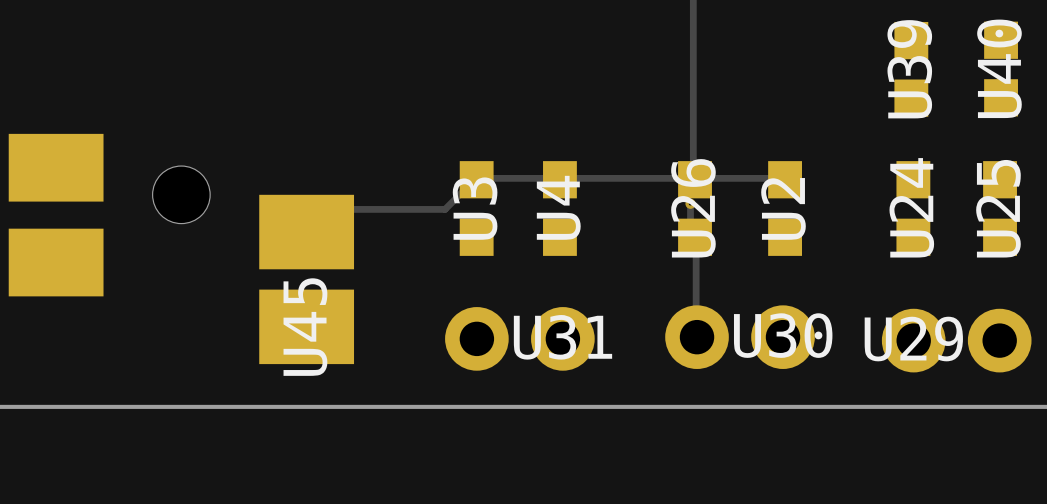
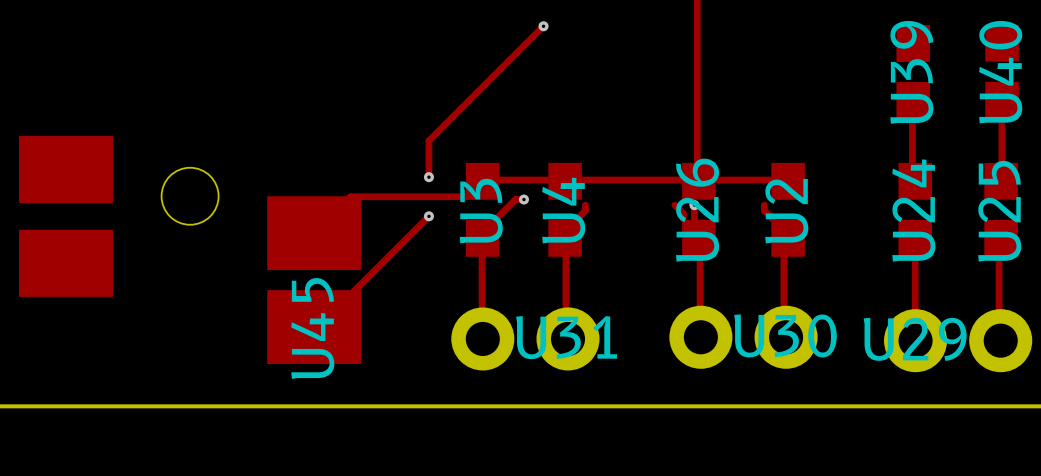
track: none -> (543, 26) (428, 140) (428, 177)
via: none -> (543, 26)
track: none -> (912, 115) (912, 163)
track: none -> (1001, 115) (1001, 163)
via: none -> (428, 177)
track: (464, 189) (445, 209) (346, 209) -> none
track: none -> (468, 196) (350, 196) (347, 199)
track: none -> (523, 199) (515, 199) (496, 219)
via: none -> (523, 199)
track: none -> (585, 205) (585, 210) (577, 219)
track: none -> (674, 205) (683, 213) (683, 219)
track: none -> (764, 205) (764, 210) (772, 219)
track: none -> (428, 216) (353, 291)
via: none -> (428, 216)
track: none -> (482, 252) (482, 316)
track: none -> (565, 252) (565, 316)
track: none -> (783, 252) (783, 316)
track: none -> (915, 252) (915, 319)
track: none -> (999, 252) (999, 319)

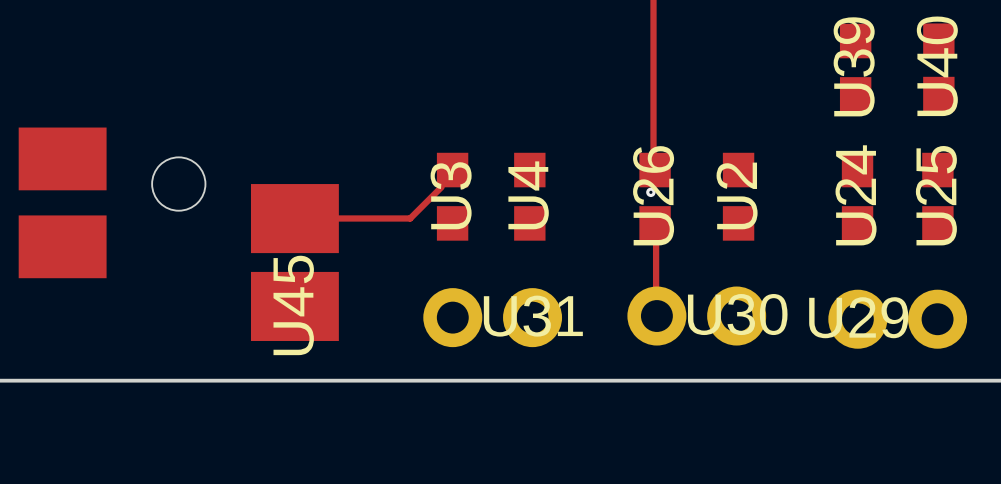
track: (543, 26) (428, 140) (428, 177) -> none
via: (543, 26) -> none
track: (912, 115) (912, 163) -> none
track: (1001, 115) (1001, 163) -> none
via: (428, 177) -> none
track: (493, 179) (551, 179) -> none
track: (574, 179) (686, 179) -> none
track: (708, 179) (775, 179) -> none
track: (468, 196) (350, 196) (347, 199) -> none
track: none -> (441, 187) (410, 218) (336, 218)
track: (523, 199) (515, 199) (496, 219) -> none
via: (523, 199) -> none
track: (585, 205) (585, 210) (577, 219) -> none
track: (674, 205) (683, 213) (683, 219) -> none
track: (694, 205) (694, 224) -> none
track: (764, 205) (764, 210) (772, 219) -> none
track: (428, 216) (353, 291) -> none
via: (428, 216) -> none
track: (482, 252) (482, 316) -> none
track: (565, 252) (565, 316) -> none
track: (783, 252) (783, 316) -> none
track: (915, 252) (915, 319) -> none
track: (999, 252) (999, 319) -> none

